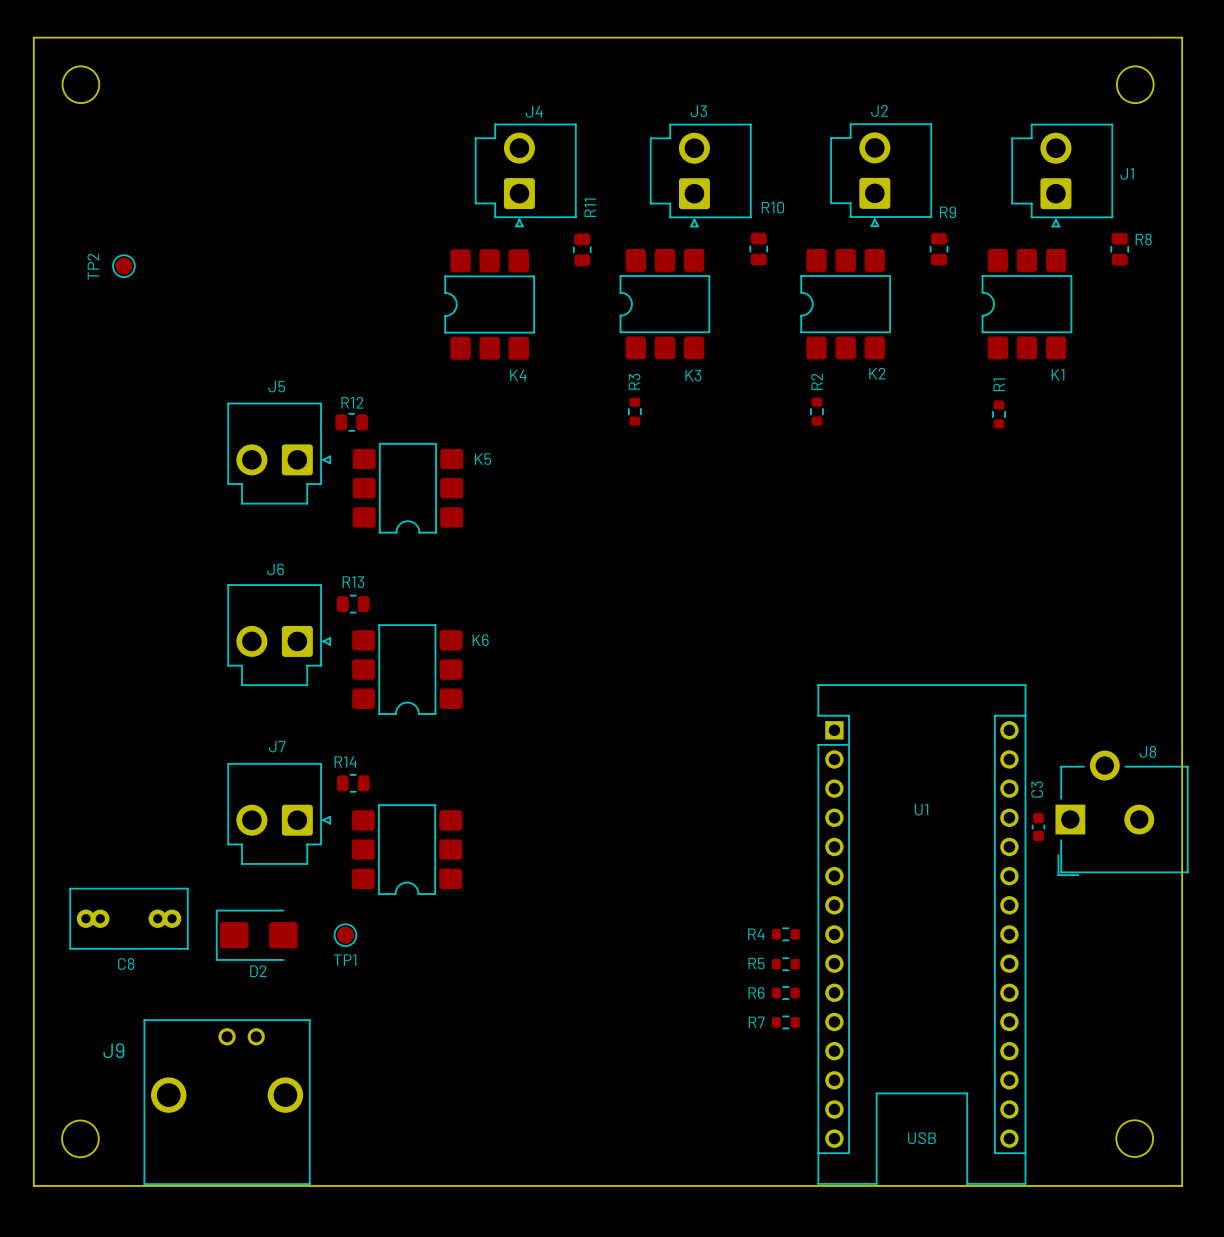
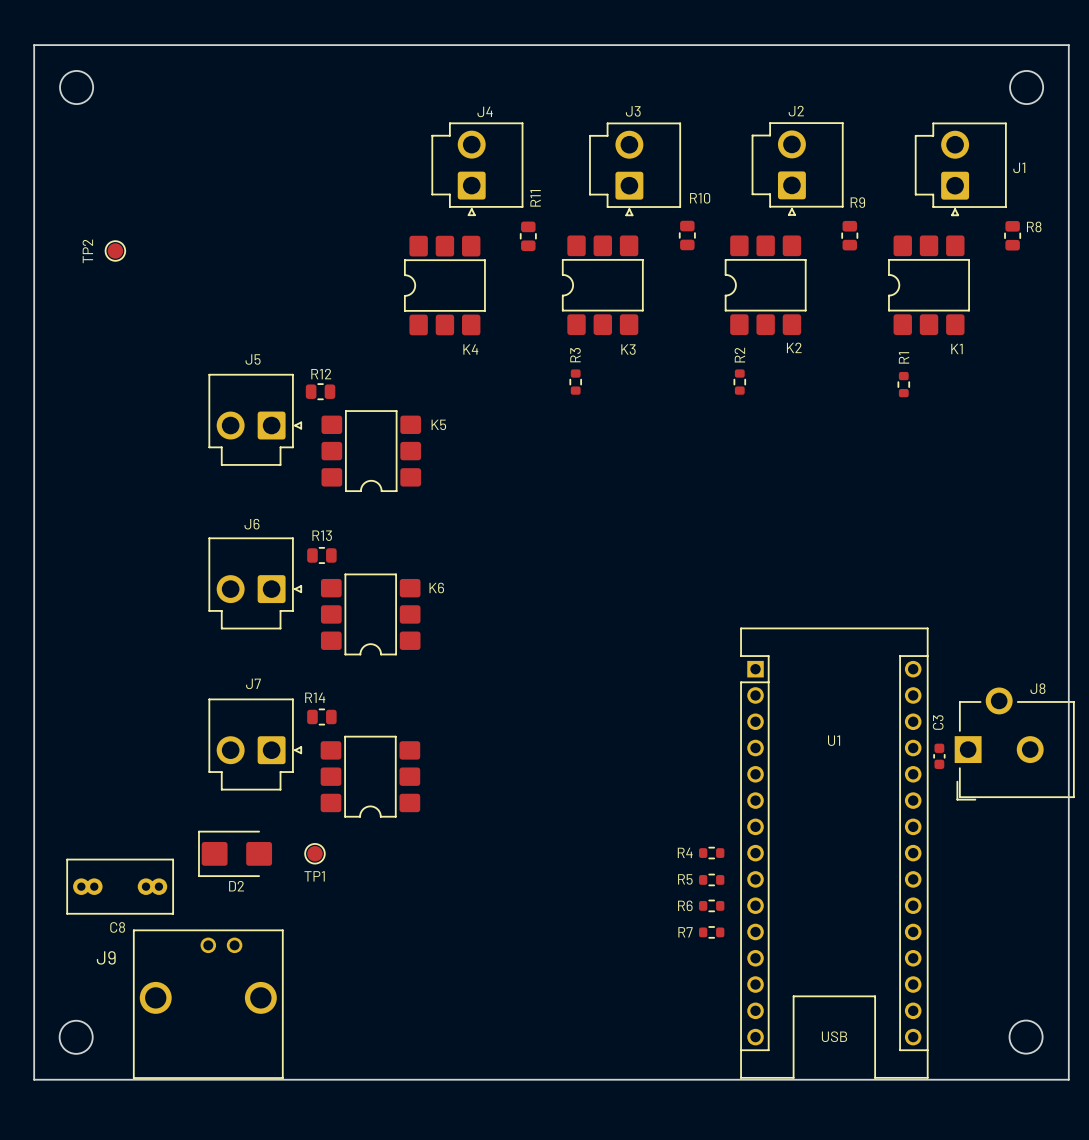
C8 position: (129, 918) -> (120, 886)

